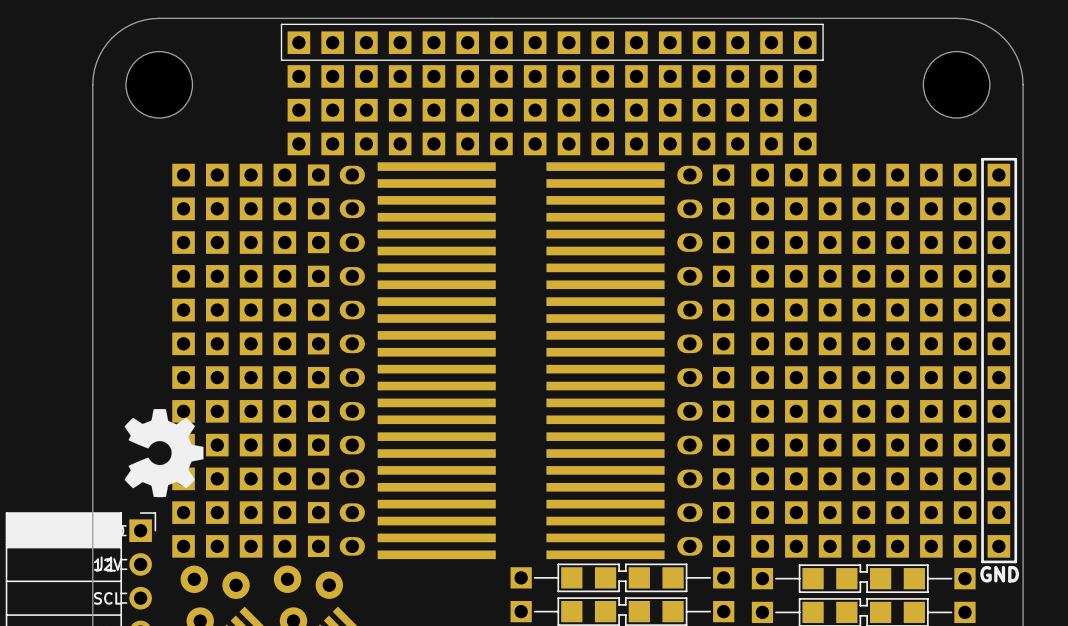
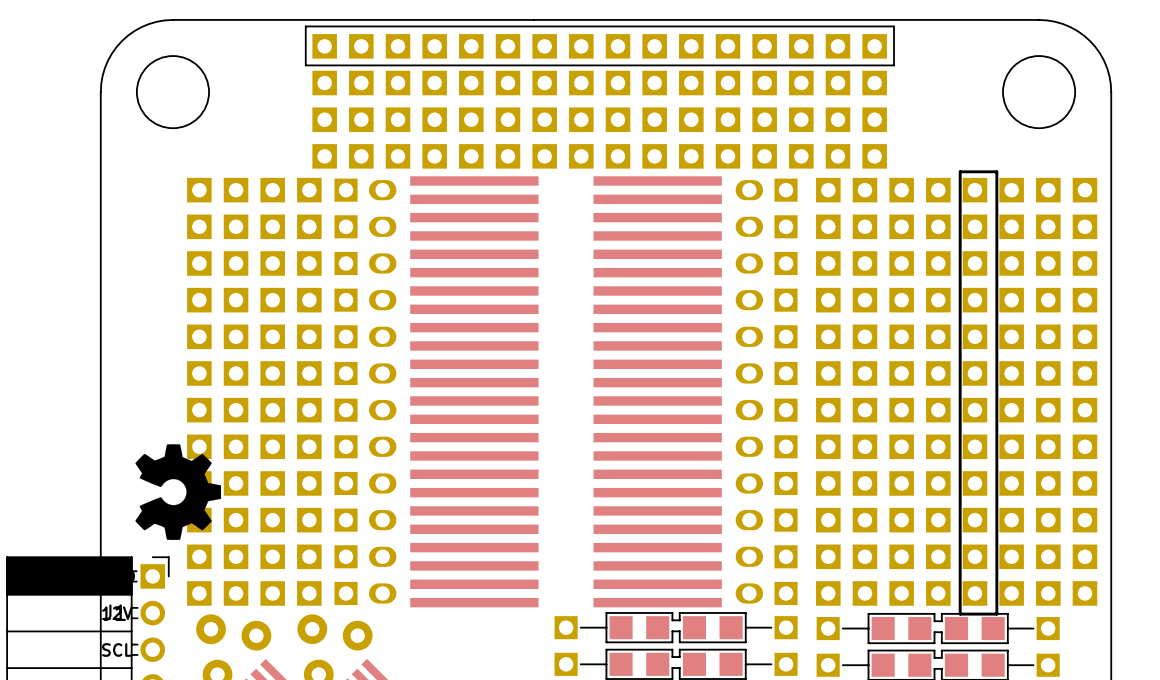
line: none -> (960, 171) (960, 614) (996, 614) (996, 171) (960, 171)
line: (982, 159) (1015, 159) (1015, 561) (982, 561) (982, 159) -> none
text: GND (999, 574) -> none

